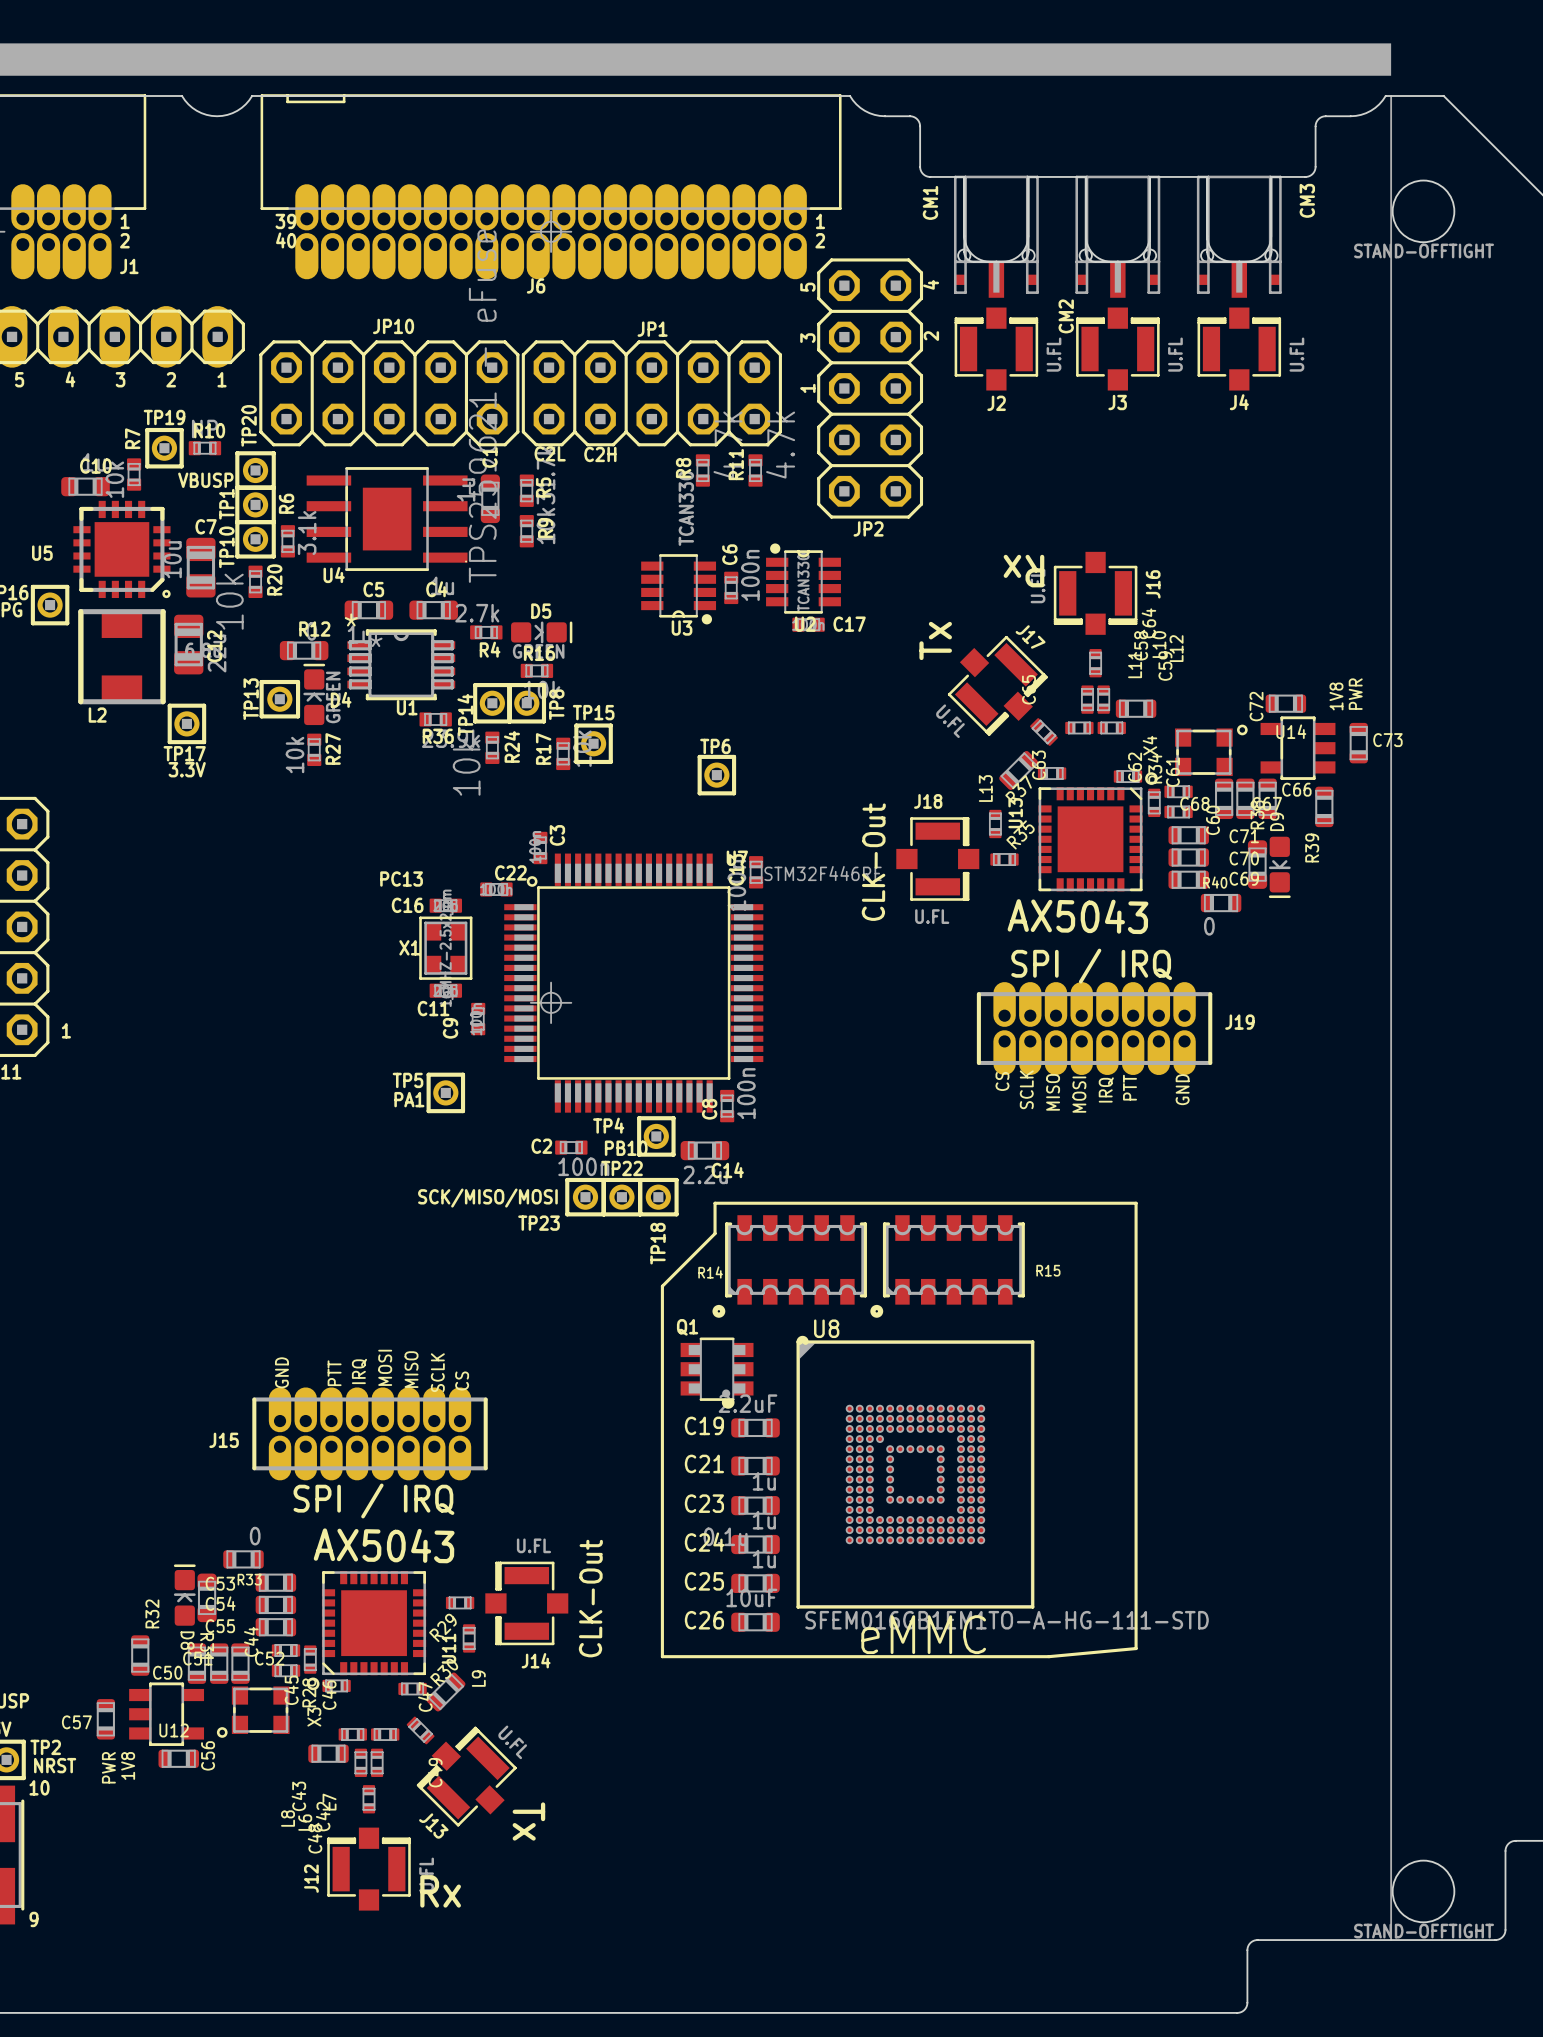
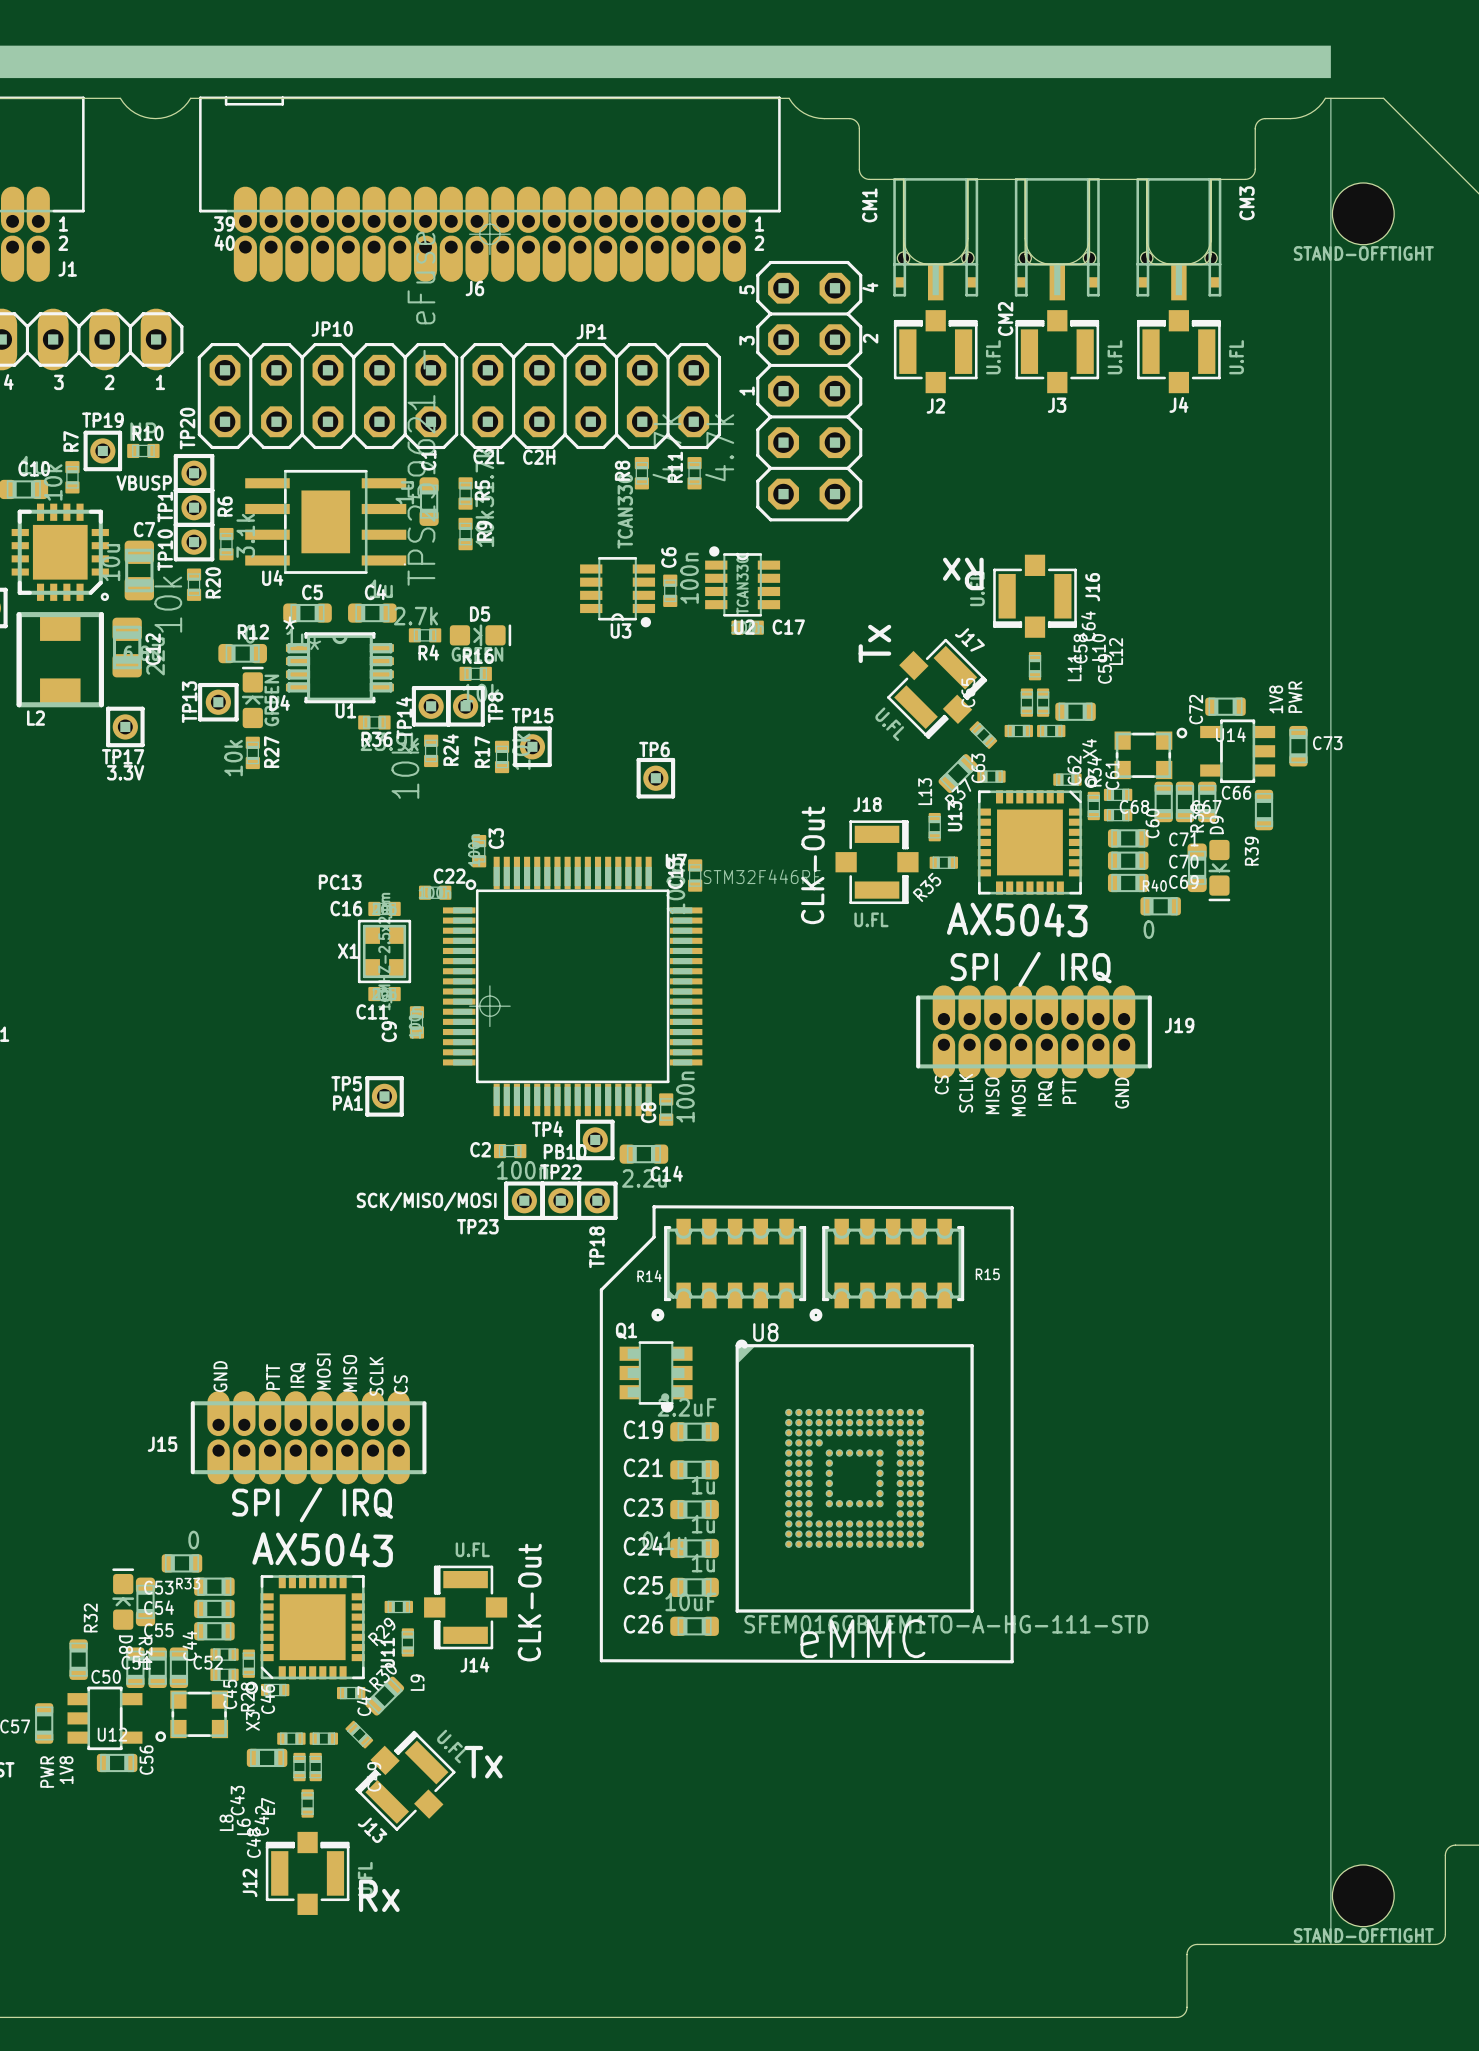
JP2 name: JP2 (868, 528) -> none
R35 name position: R35 (1020, 834) -> R35 (927, 887)
line: (715, 1203) (1136, 1203) (1136, 1648) (1049, 1656) (662, 1656) -> (654, 1206) (1012, 1207) (1012, 1661) (601, 1660)
text rotation: 0° (528, 1821) -> 90° counterclockwise (483, 1762)
text position: Tx (528, 1821) -> Tx (483, 1762)

